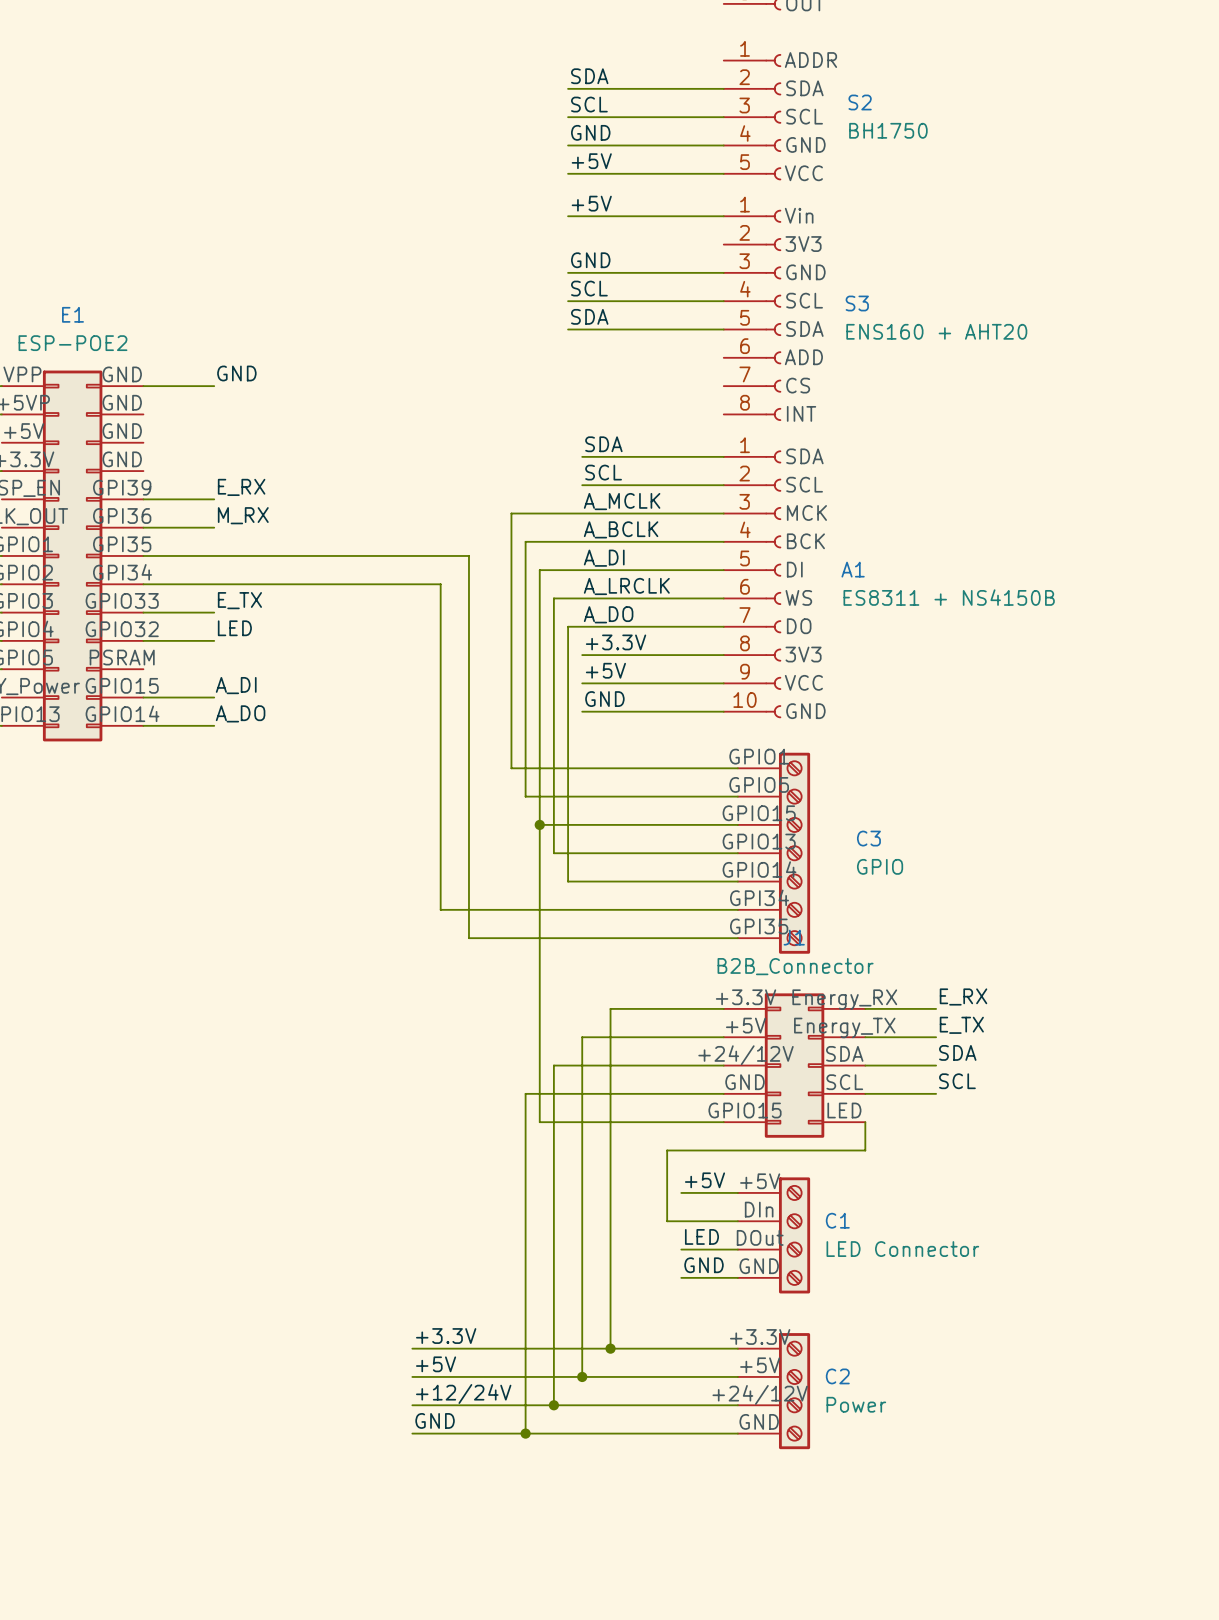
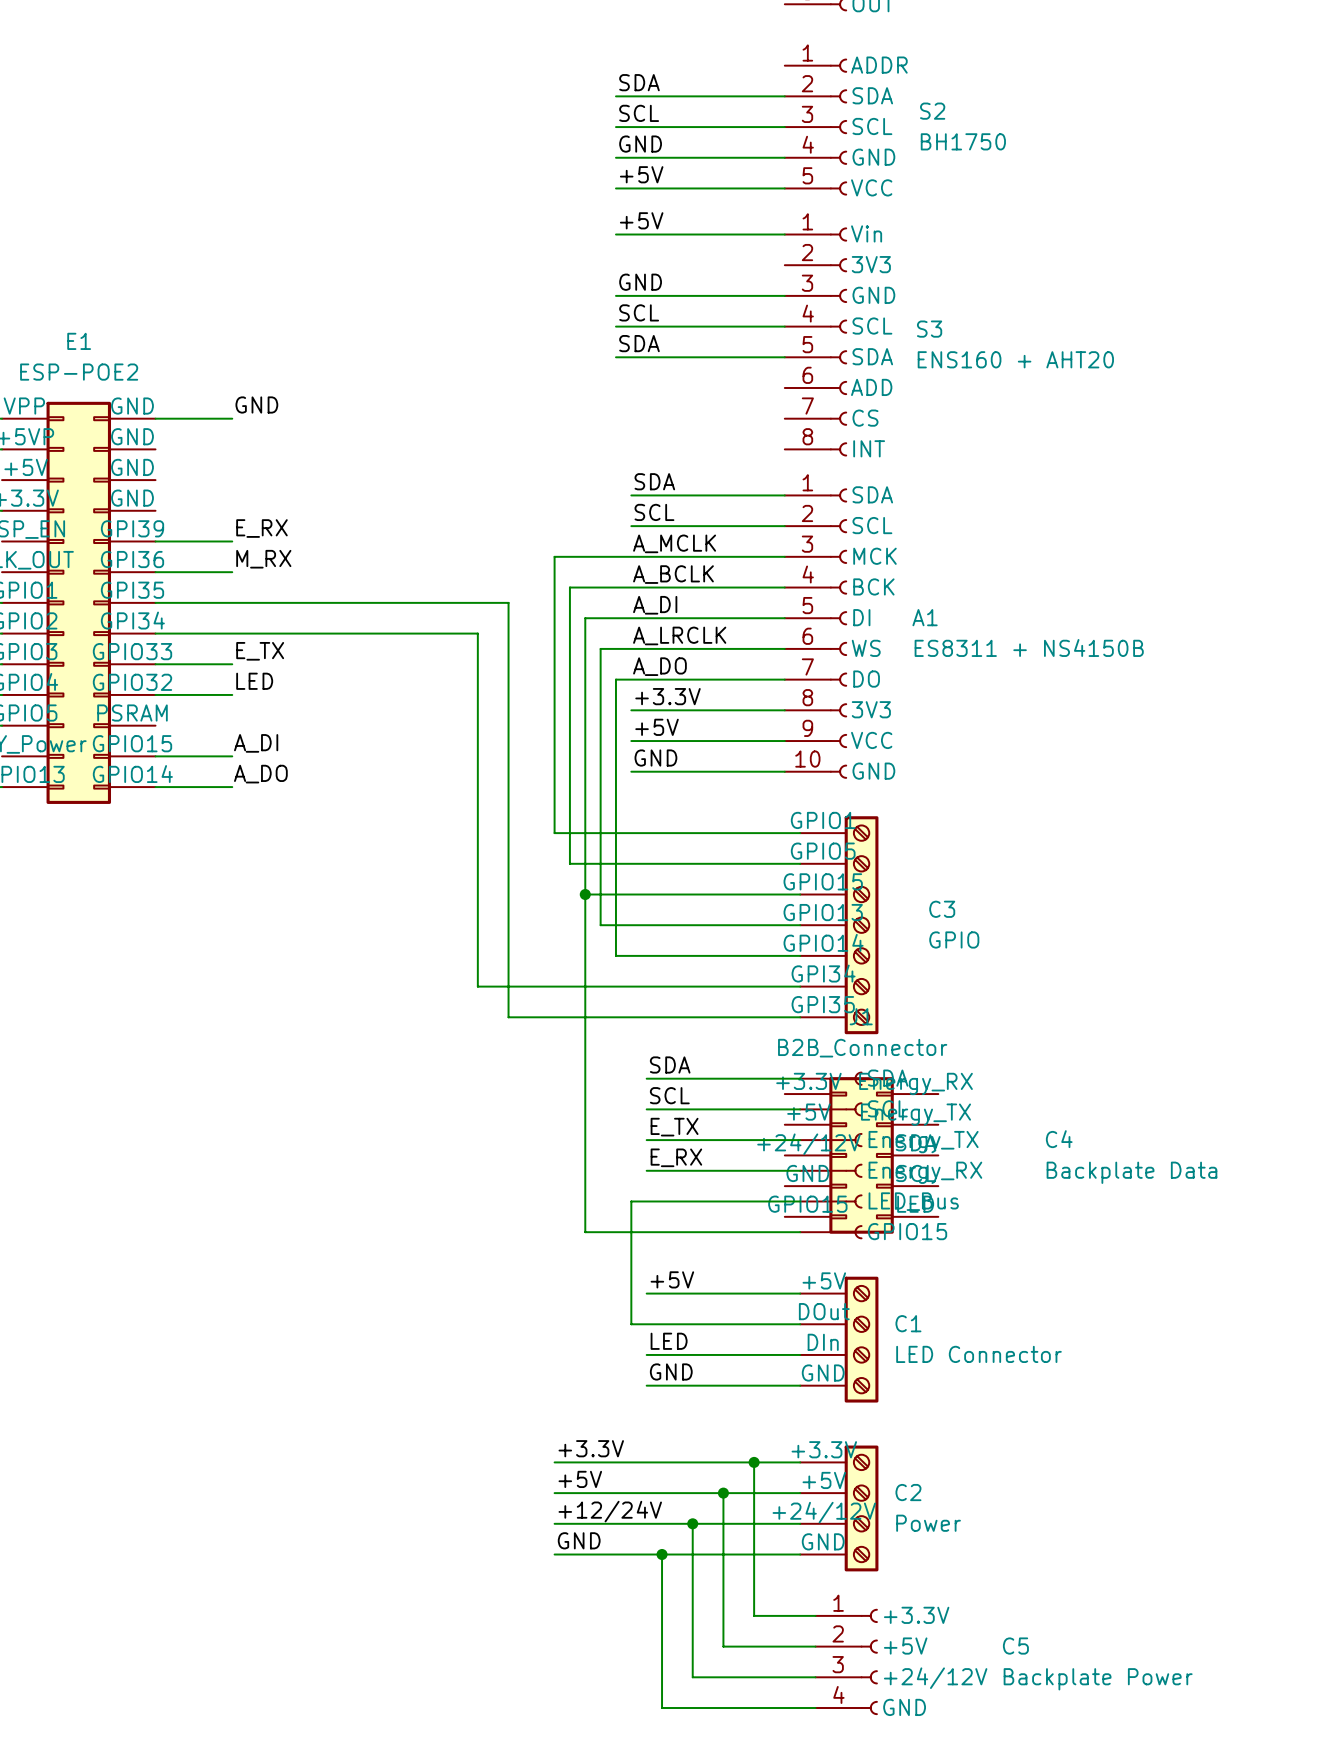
label: none -> SDA (670, 1065)
wire: none -> (646, 1078) (800, 1078)
label: E_RX (963, 996) -> none
wire: (723, 1008) (610, 1008) (610, 1348) -> none
wire: (865, 1008) (936, 1008) -> none
label: none -> SCL (669, 1095)
wire: none -> (646, 1109) (800, 1109)
label: E_TX (961, 1025) -> none
wire: (723, 1037) (582, 1037) (582, 1108) -> (800, 1201) (631, 1201)
wire: (865, 1037) (936, 1037) -> none
label: none -> E_TX (674, 1127)
wire: none -> (646, 1140) (800, 1140)
label: SDA (957, 1052) -> none
wire: (723, 1065) (553, 1065) (553, 1405) -> none
C4: none -> Backplate Data (831, 1155)
wire: (865, 1065) (936, 1065) -> none
label: none -> E_RX (676, 1157)
wire: none -> (646, 1170) (800, 1170)
label: SCL (957, 1081) -> none
wire: (723, 1093) (525, 1093) (525, 1433) -> none
wire: (865, 1093) (936, 1093) -> none
wire: (539, 1122) (723, 1122) -> (585, 1216) (585, 1232) (800, 1232)
wire: (865, 1122) (865, 1150) (667, 1150) (667, 1221) -> none
label position: +5V (705, 1180) -> +5V (672, 1279)
wire: none -> (646, 1293) (738, 1293)
C1 pin name: DIn (759, 1209) -> DOut (824, 1311)
wire: (582, 1221) (582, 1376) -> (631, 1324) (723, 1324)
label position: LED (701, 1236) -> LED (669, 1341)
C1 pin name: DOut (760, 1237) -> DIn (823, 1342)
wire: none -> (646, 1354) (738, 1354)
label position: GND (703, 1265) -> GND (671, 1371)
wire: none -> (646, 1385) (738, 1385)
label position: +3.3V (446, 1336) -> +3.3V (591, 1448)
wire: (412, 1348) (511, 1348) -> none
junction: (610, 1348) -> none
wire: none -> (754, 1462) (754, 1615) (815, 1615)
junction: none -> (754, 1462)
label position: +5V (436, 1364) -> +5V (580, 1479)
wire: (412, 1376) (511, 1376) -> none
junction: (582, 1376) -> none
wire: none -> (723, 1493) (723, 1646) (815, 1646)
junction: none -> (723, 1493)
label position: +12/24V (463, 1394) -> +12/24V (610, 1511)
wire: (412, 1405) (511, 1405) -> none
junction: (553, 1405) -> none
wire: none -> (692, 1523) (692, 1677) (815, 1677)
junction: none -> (692, 1523)
label position: GND (435, 1420) -> GND (579, 1540)
wire: (412, 1433) (511, 1433) -> none
junction: (525, 1433) -> none
wire: none -> (662, 1554) (662, 1708) (815, 1708)
junction: none -> (662, 1554)
C5: none -> Backplate Power (846, 1661)

